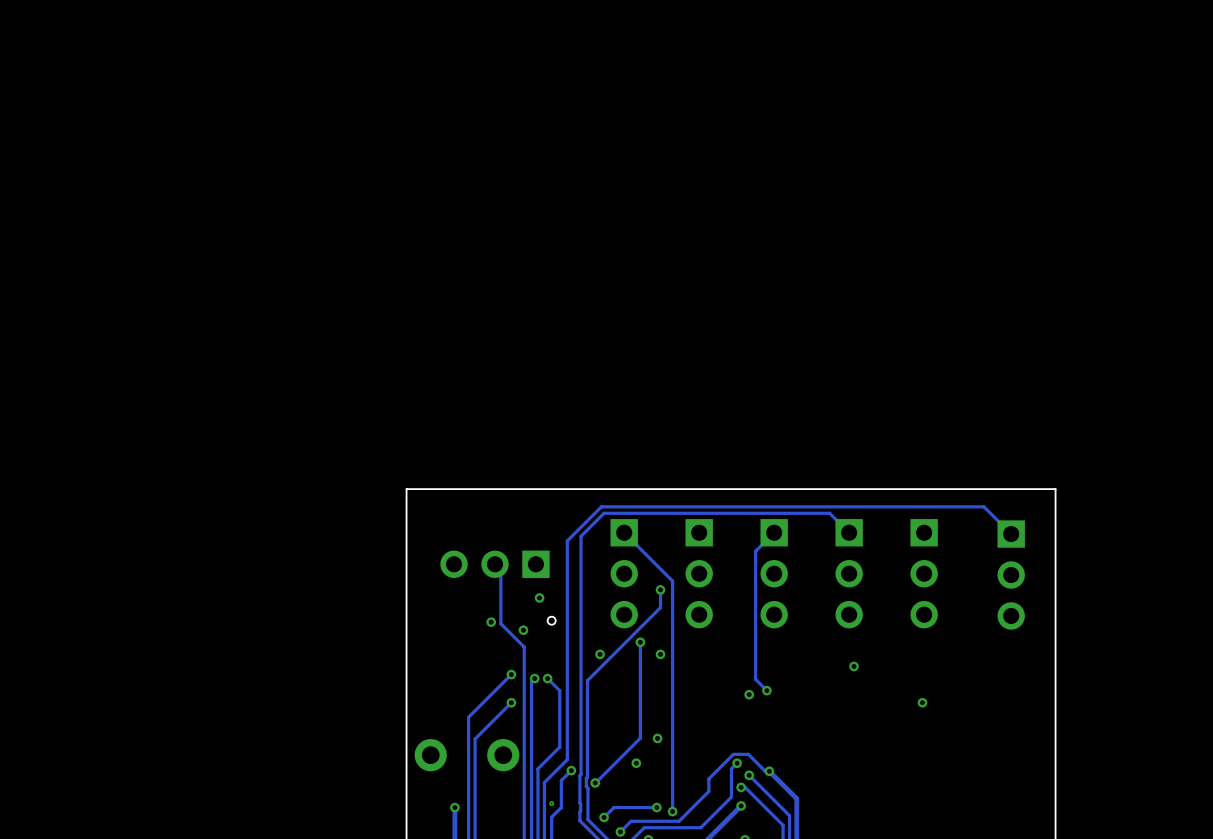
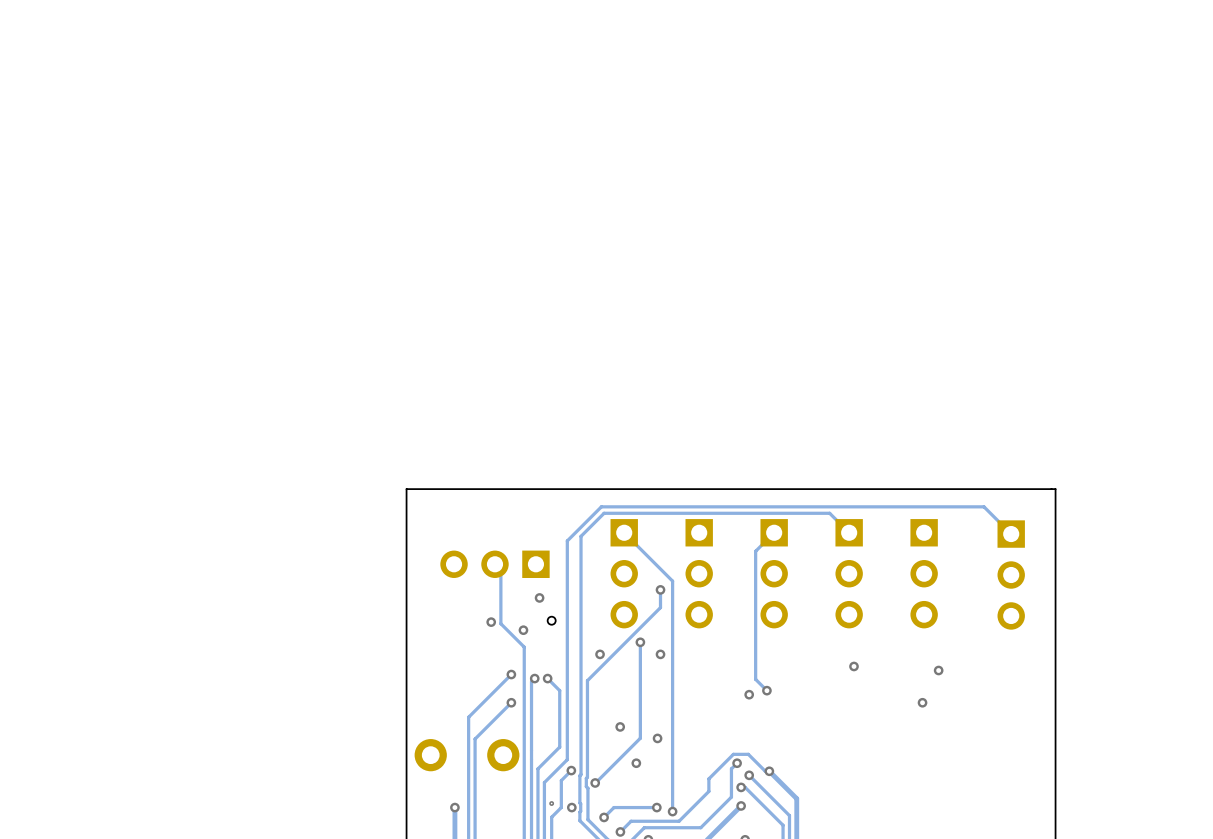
via: none -> (938, 670)
via: none -> (620, 726)
via: none -> (571, 807)

